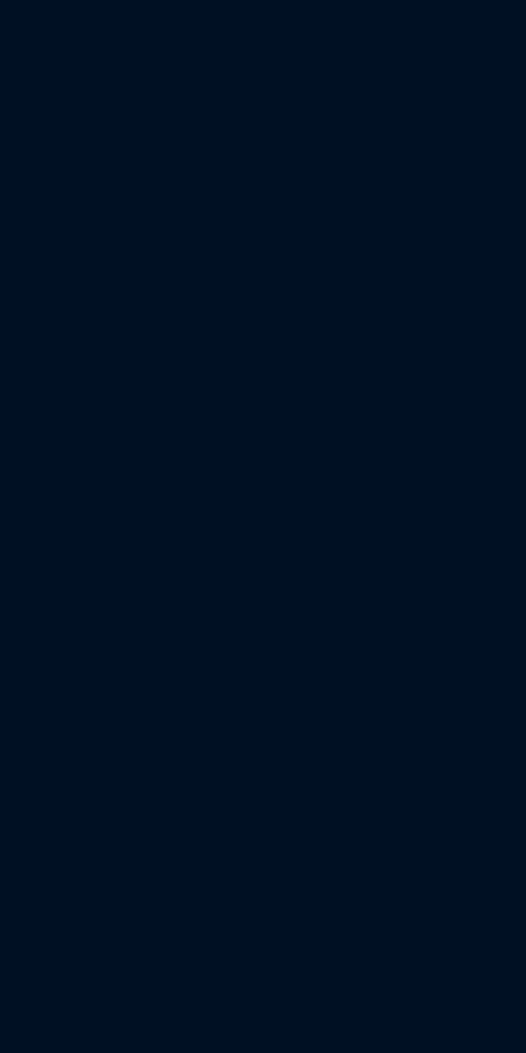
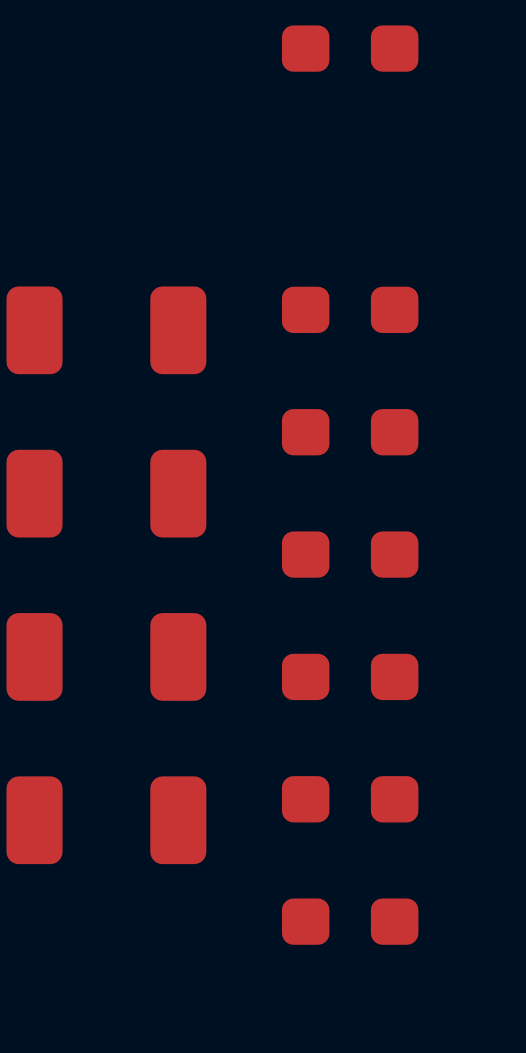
part: none -> (350, 48)
part: none -> (350, 309)
part: none -> (106, 330)
part: none -> (350, 432)
part: none -> (106, 493)
part: none -> (350, 554)
part: none -> (106, 656)
part: none -> (350, 676)
part: none -> (350, 799)
part: none -> (106, 820)
part: none -> (350, 921)

